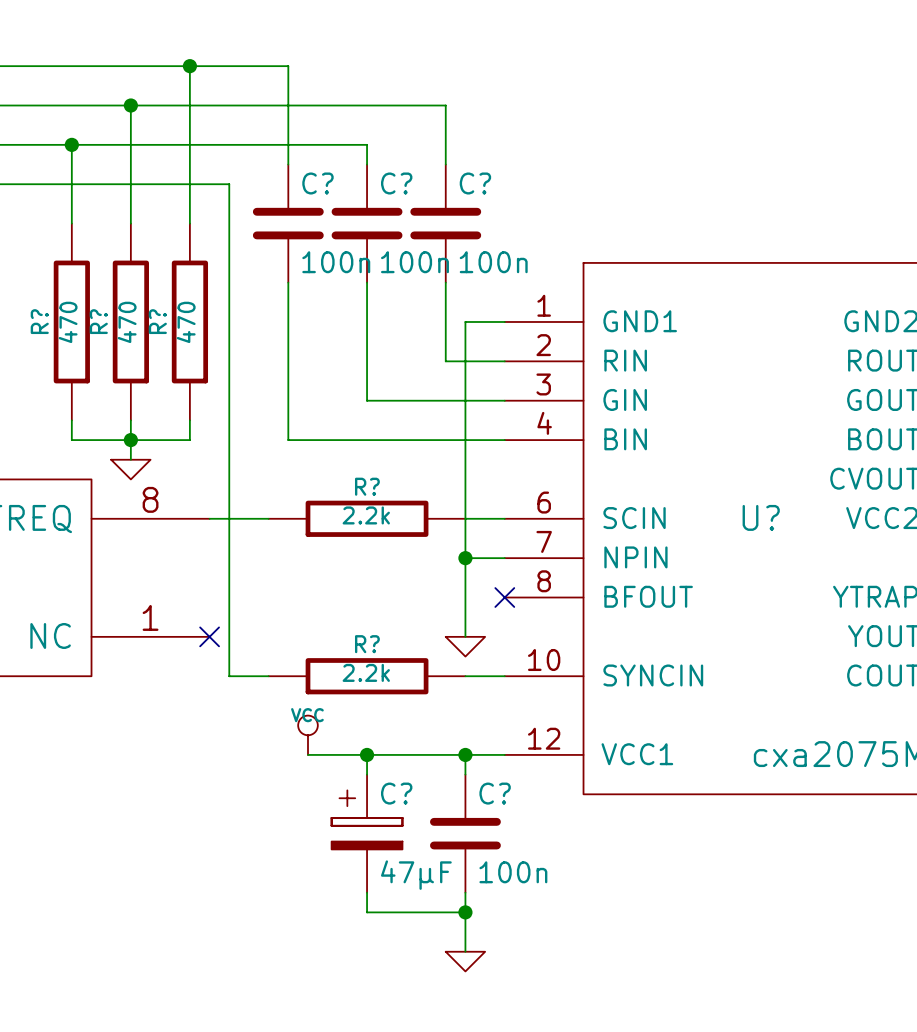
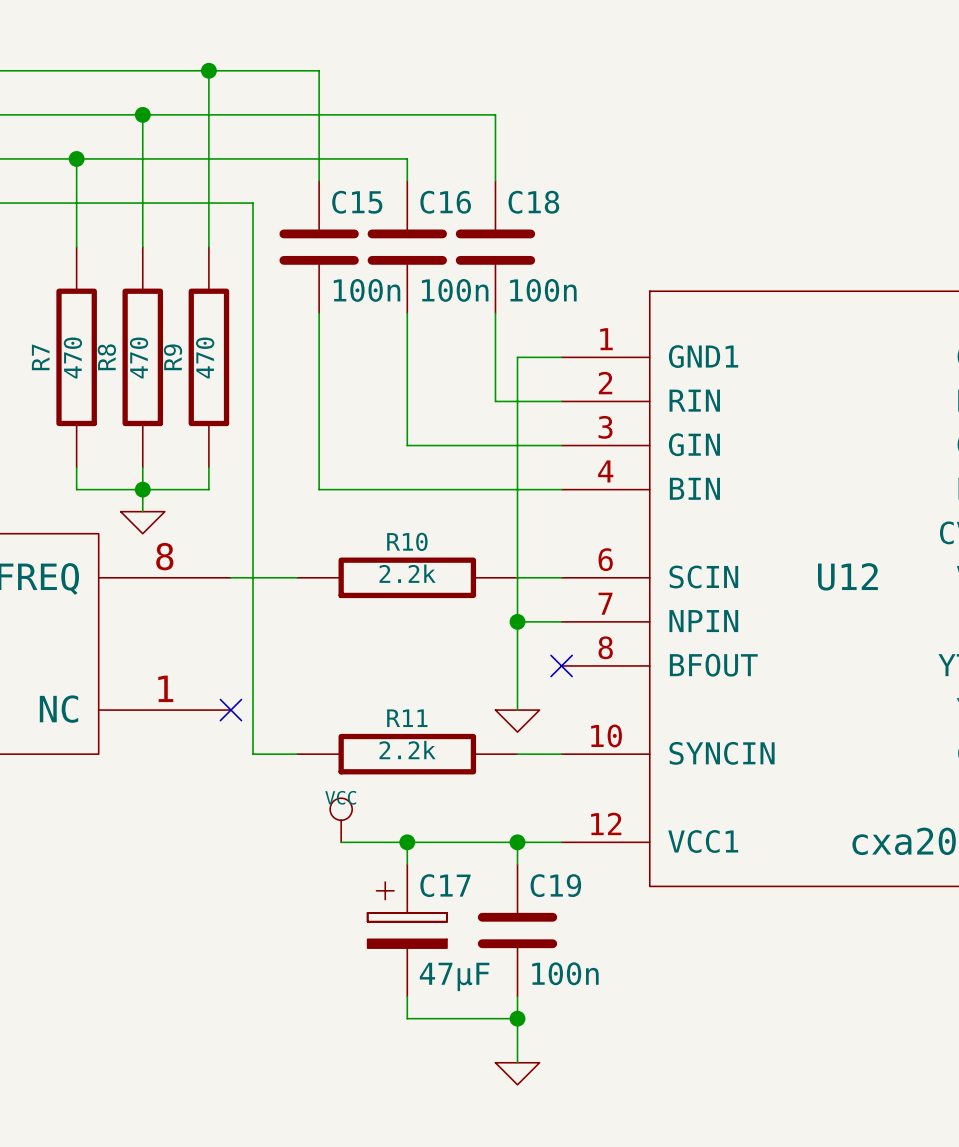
C? name: C? (317, 183) -> C15 (357, 202)
C? name: C? (396, 183) -> C16 (445, 202)
C? name: C? (475, 183) -> C18 (533, 202)
R? name: R? (39, 321) -> R7 (40, 357)
R? name: R? (98, 321) -> R8 (106, 357)
R? name: R? (157, 321) -> R9 (172, 357)
R? name: R? (367, 486) -> R10 (407, 541)
U? name: U? (761, 517) -> U12 (847, 576)
R? name: R? (367, 644) -> R11 (407, 718)
C? name: C? (396, 793) -> C17 (445, 885)
C? name: C? (495, 793) -> C19 (555, 885)

